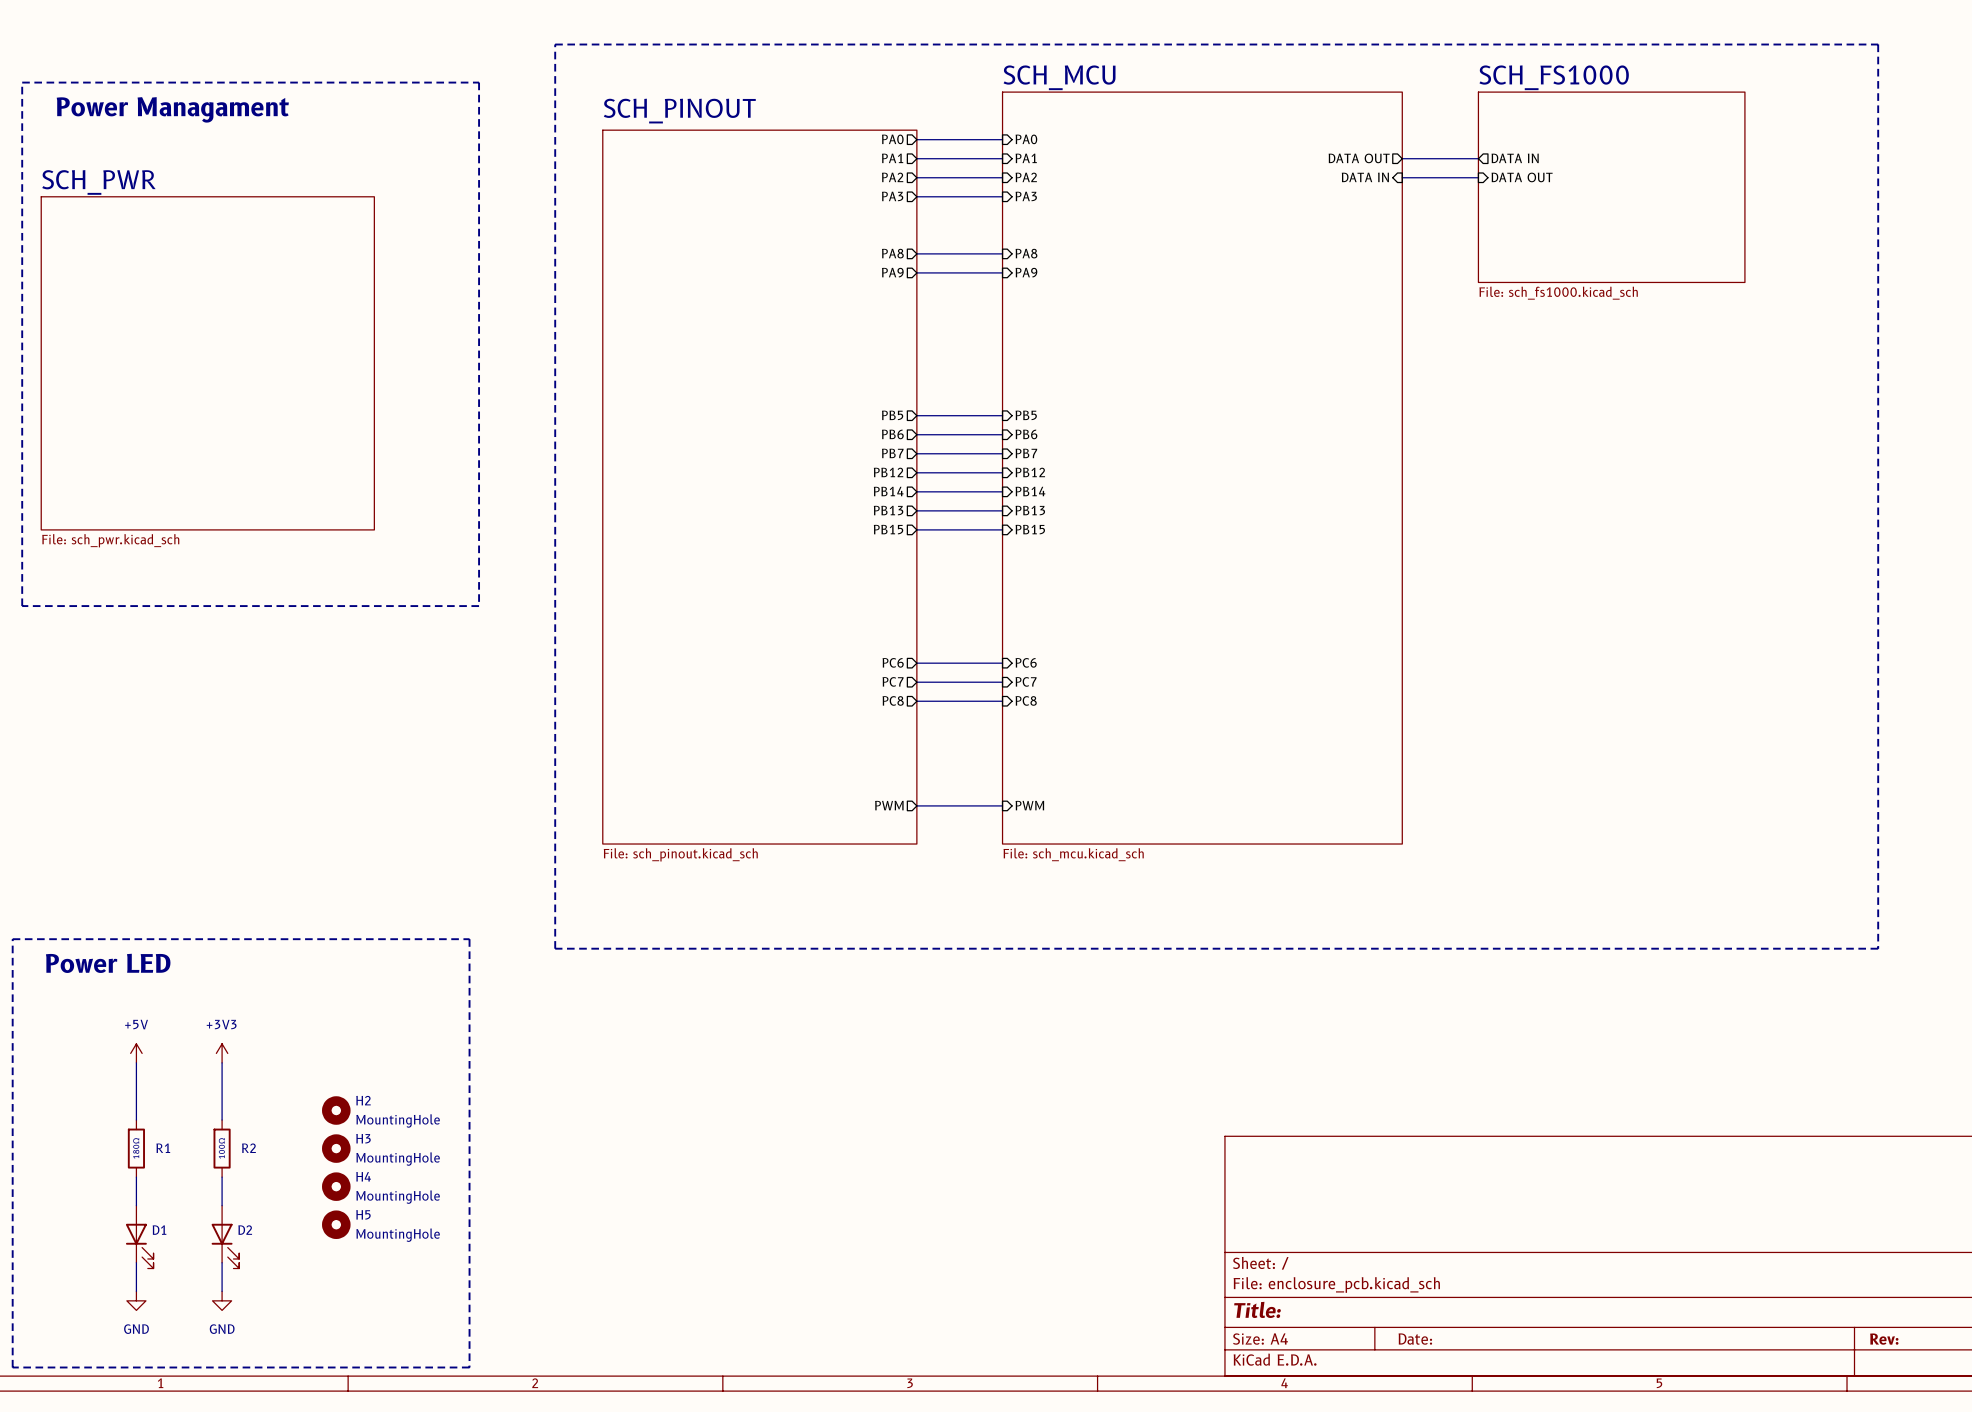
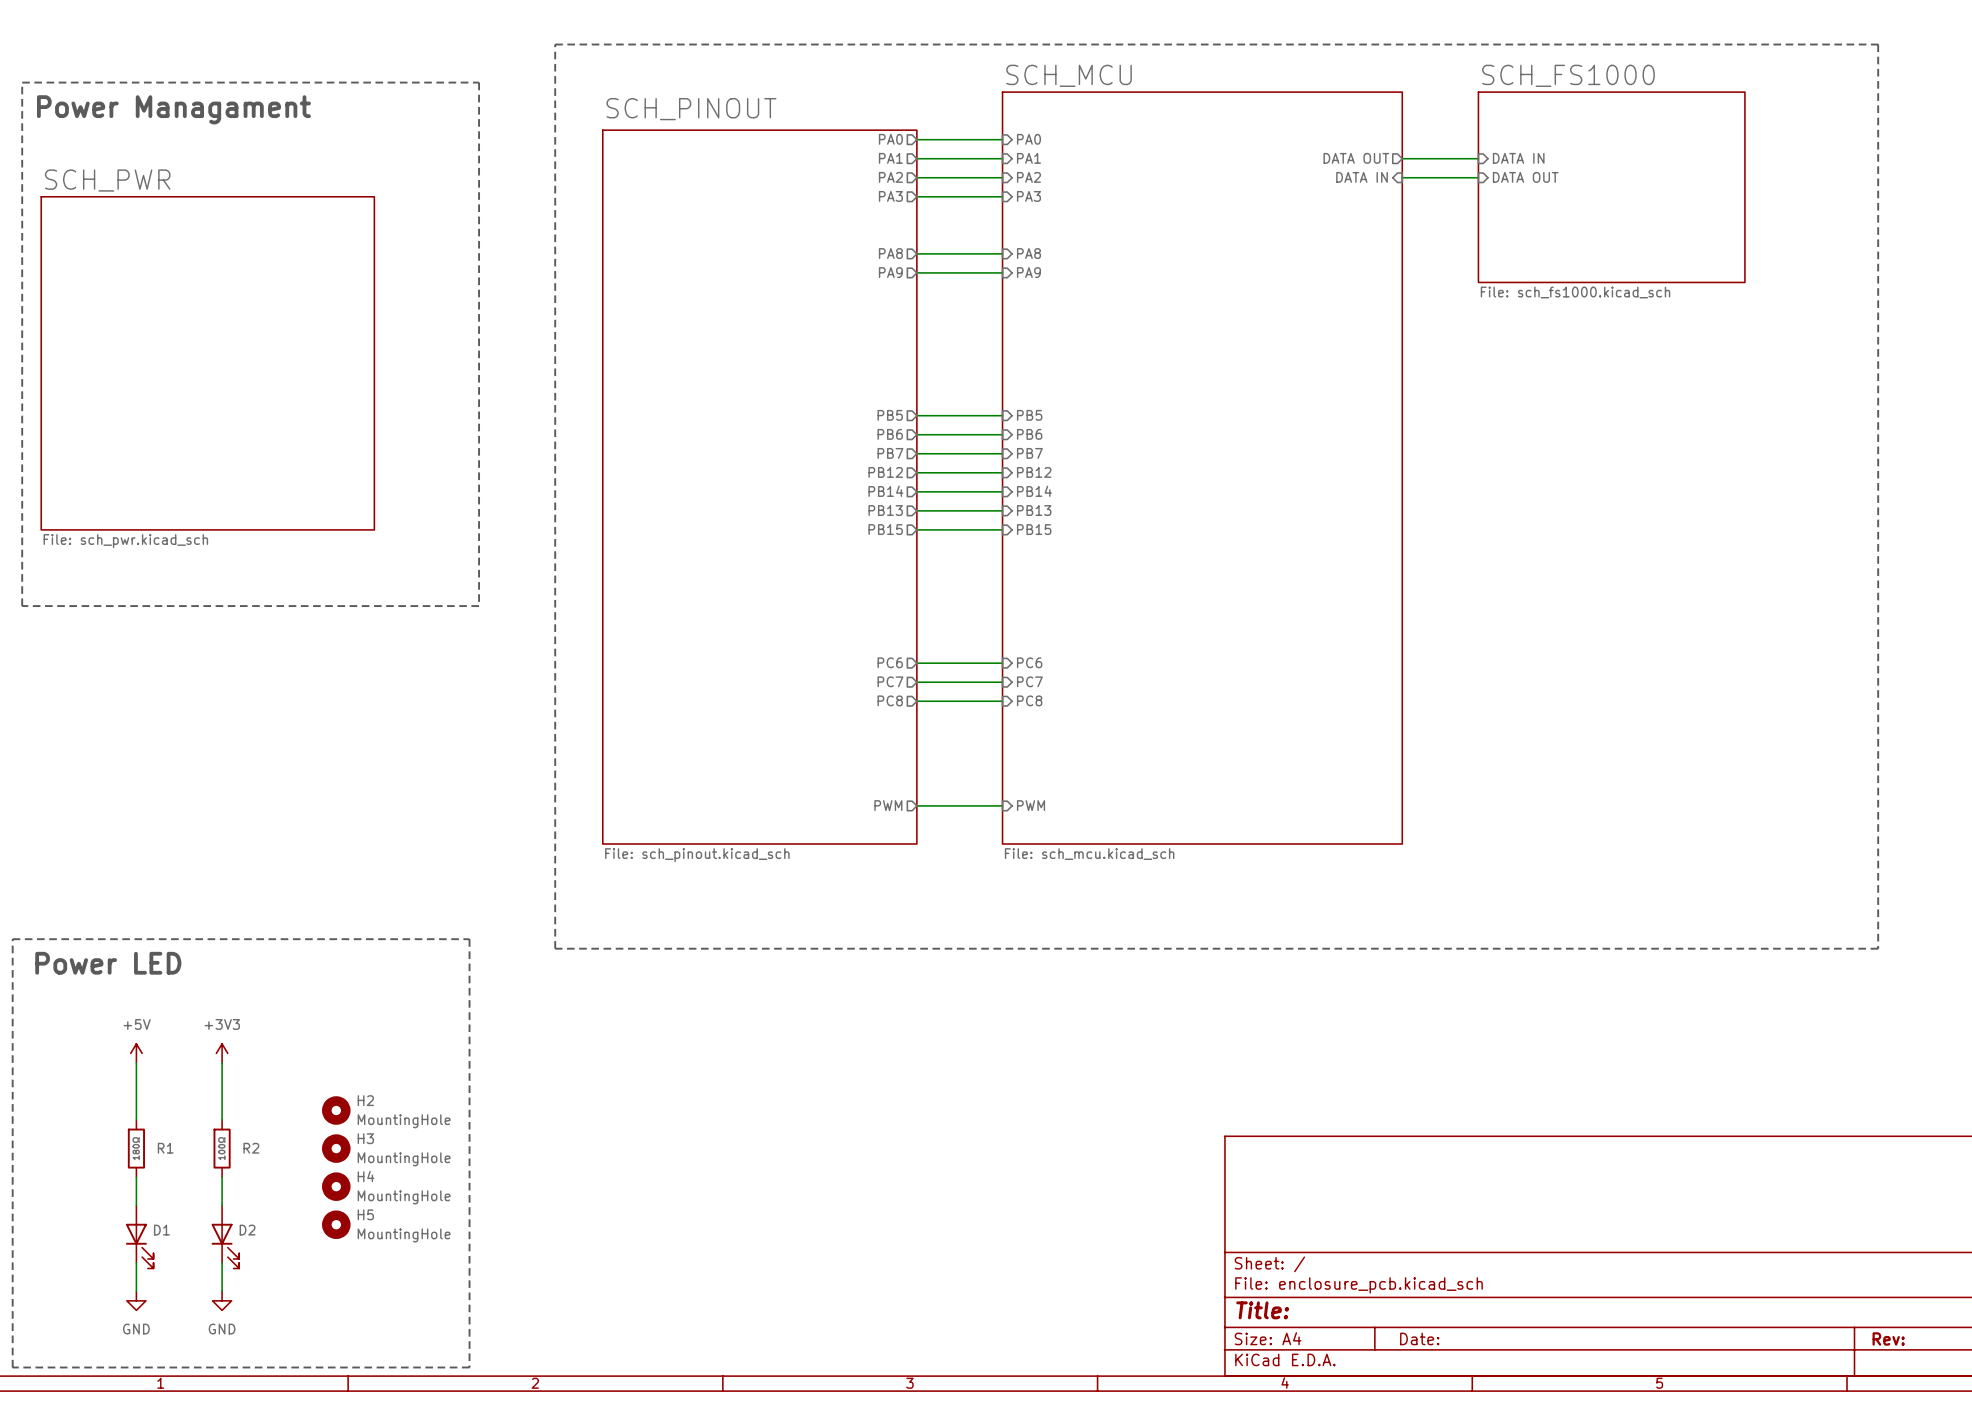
sheet pin shape: output (1515, 158) -> input (1518, 158)

